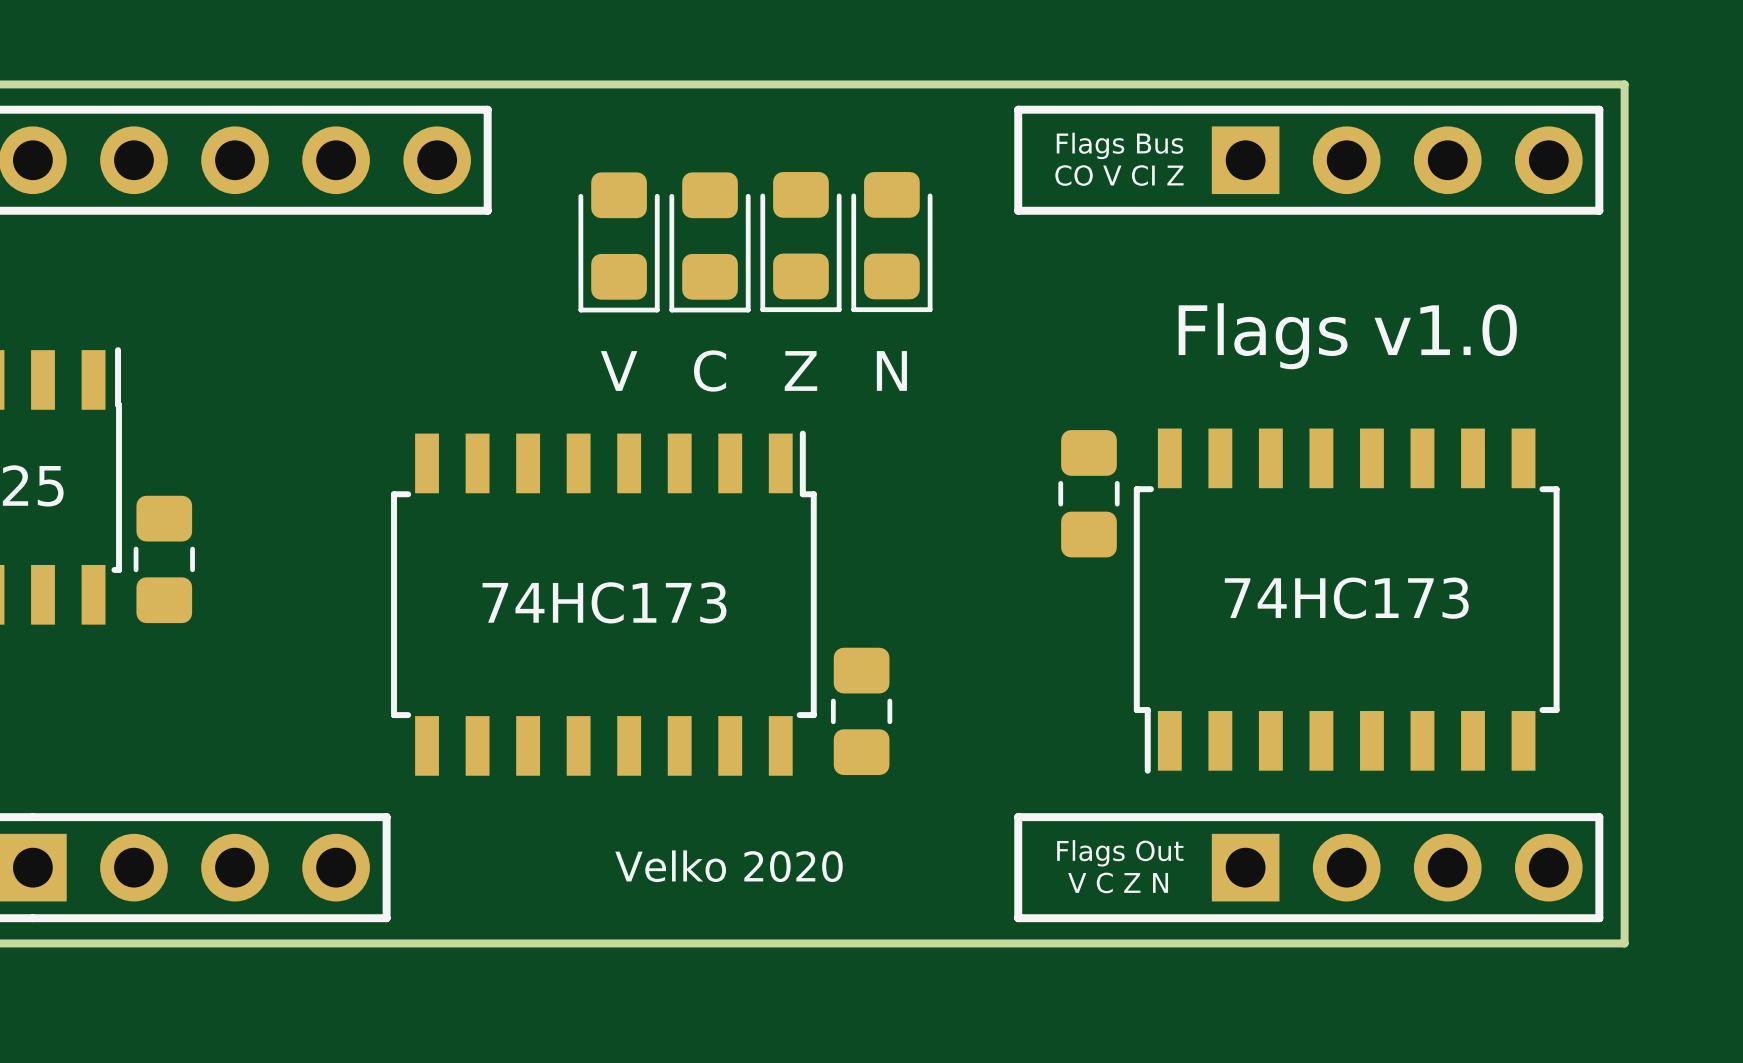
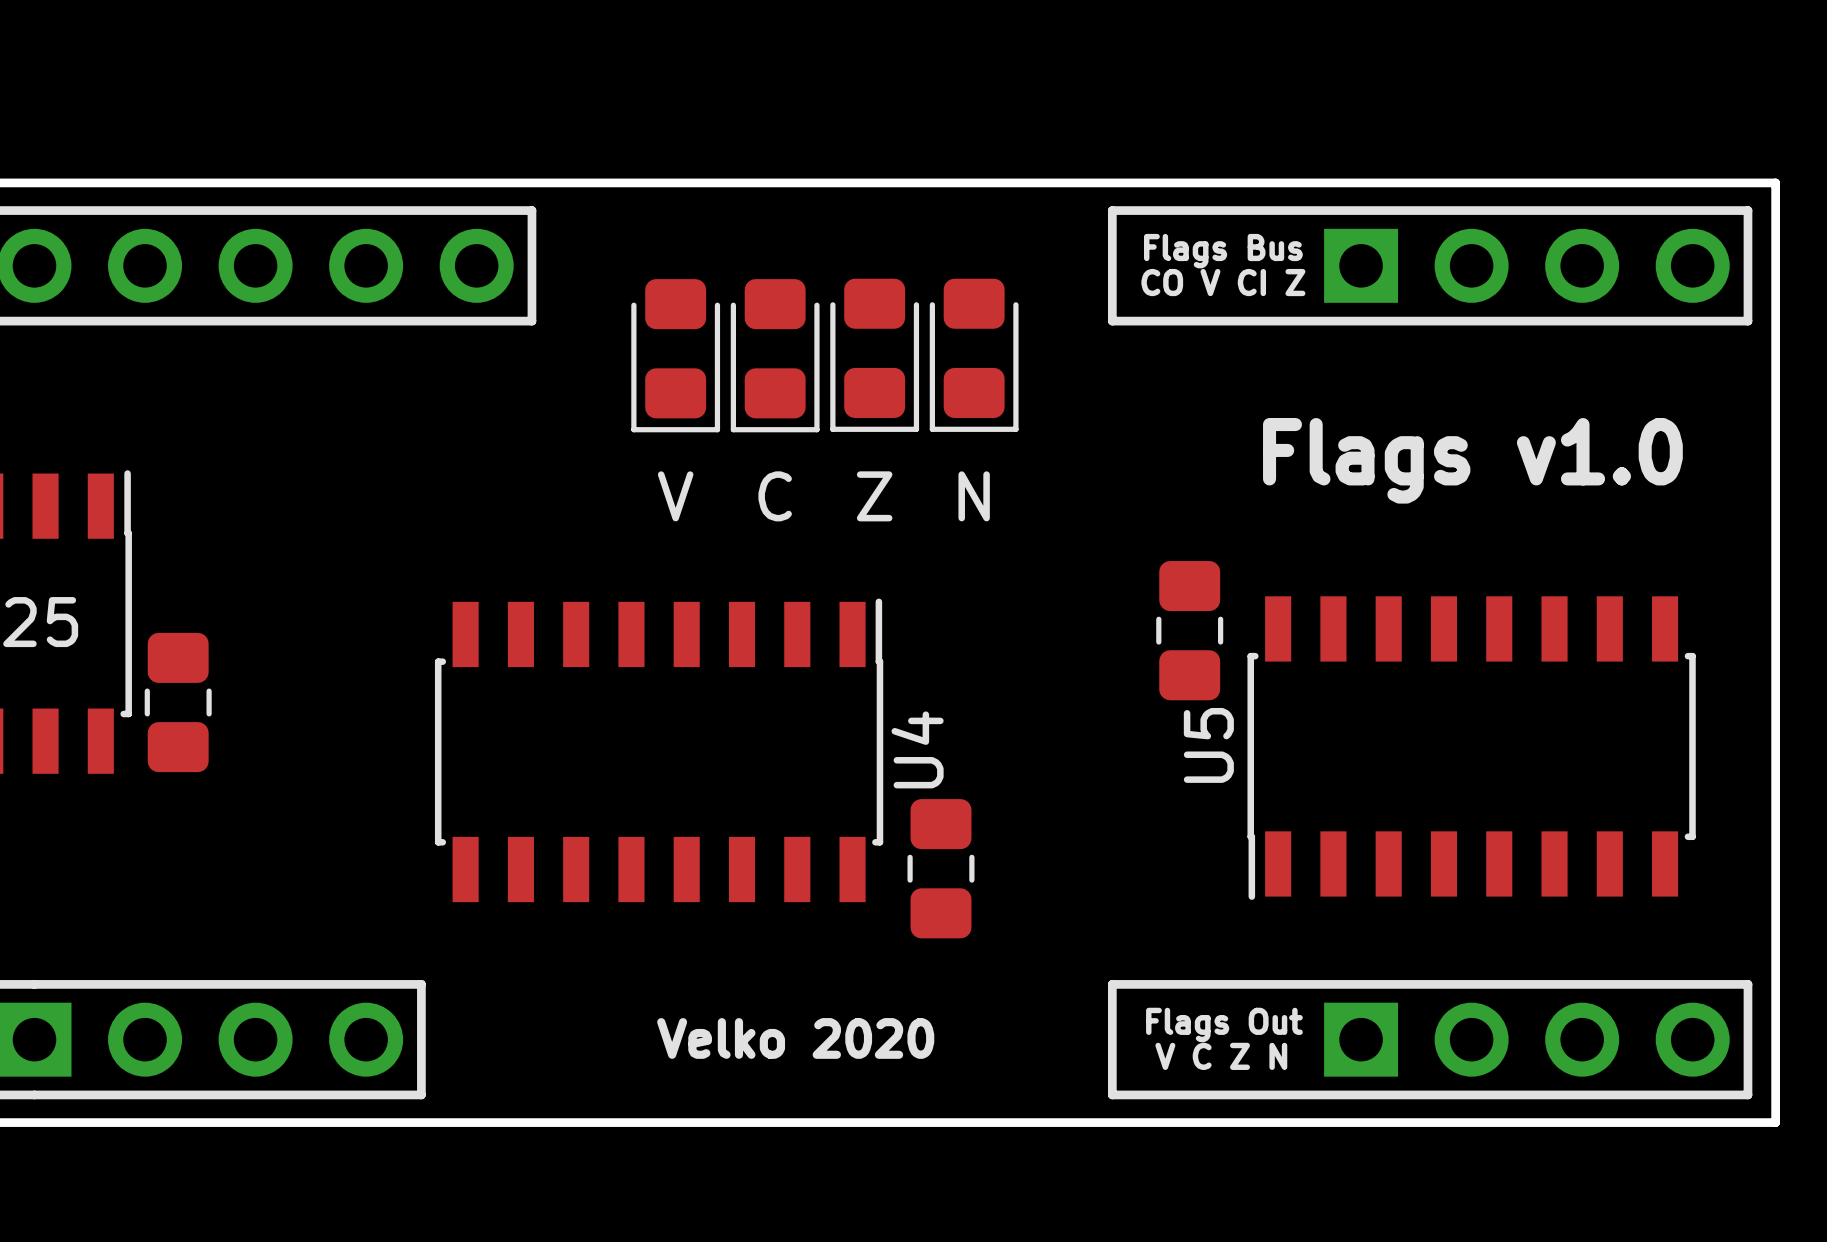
part: 74HC173 (1346, 601) -> none
U5: none -> (1471, 748)
part: 74HC173 (603, 603) -> none
U4: none -> (659, 750)

